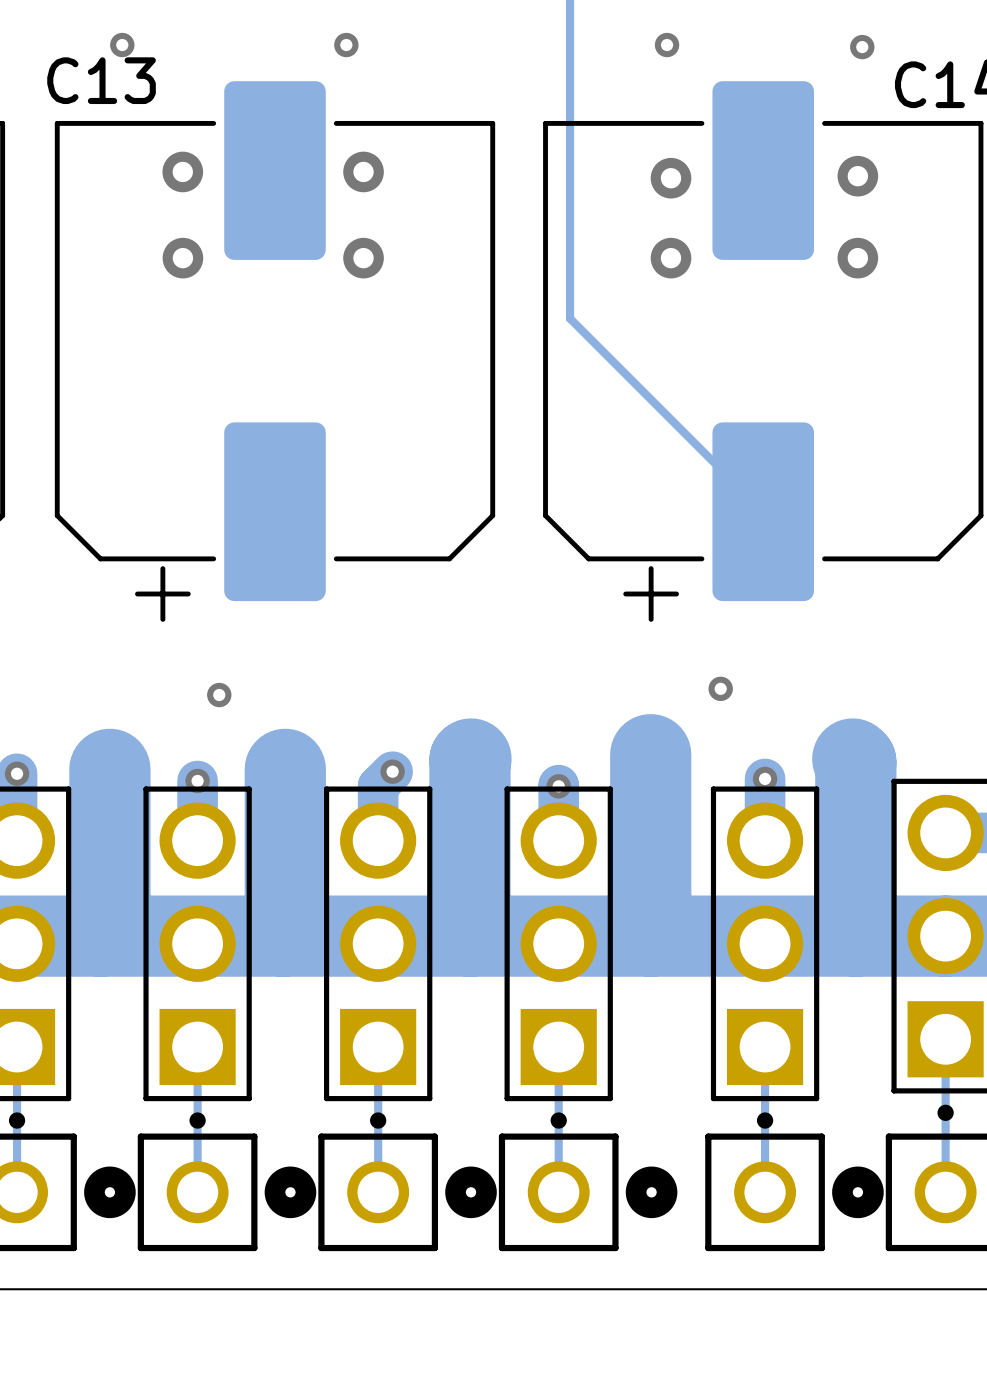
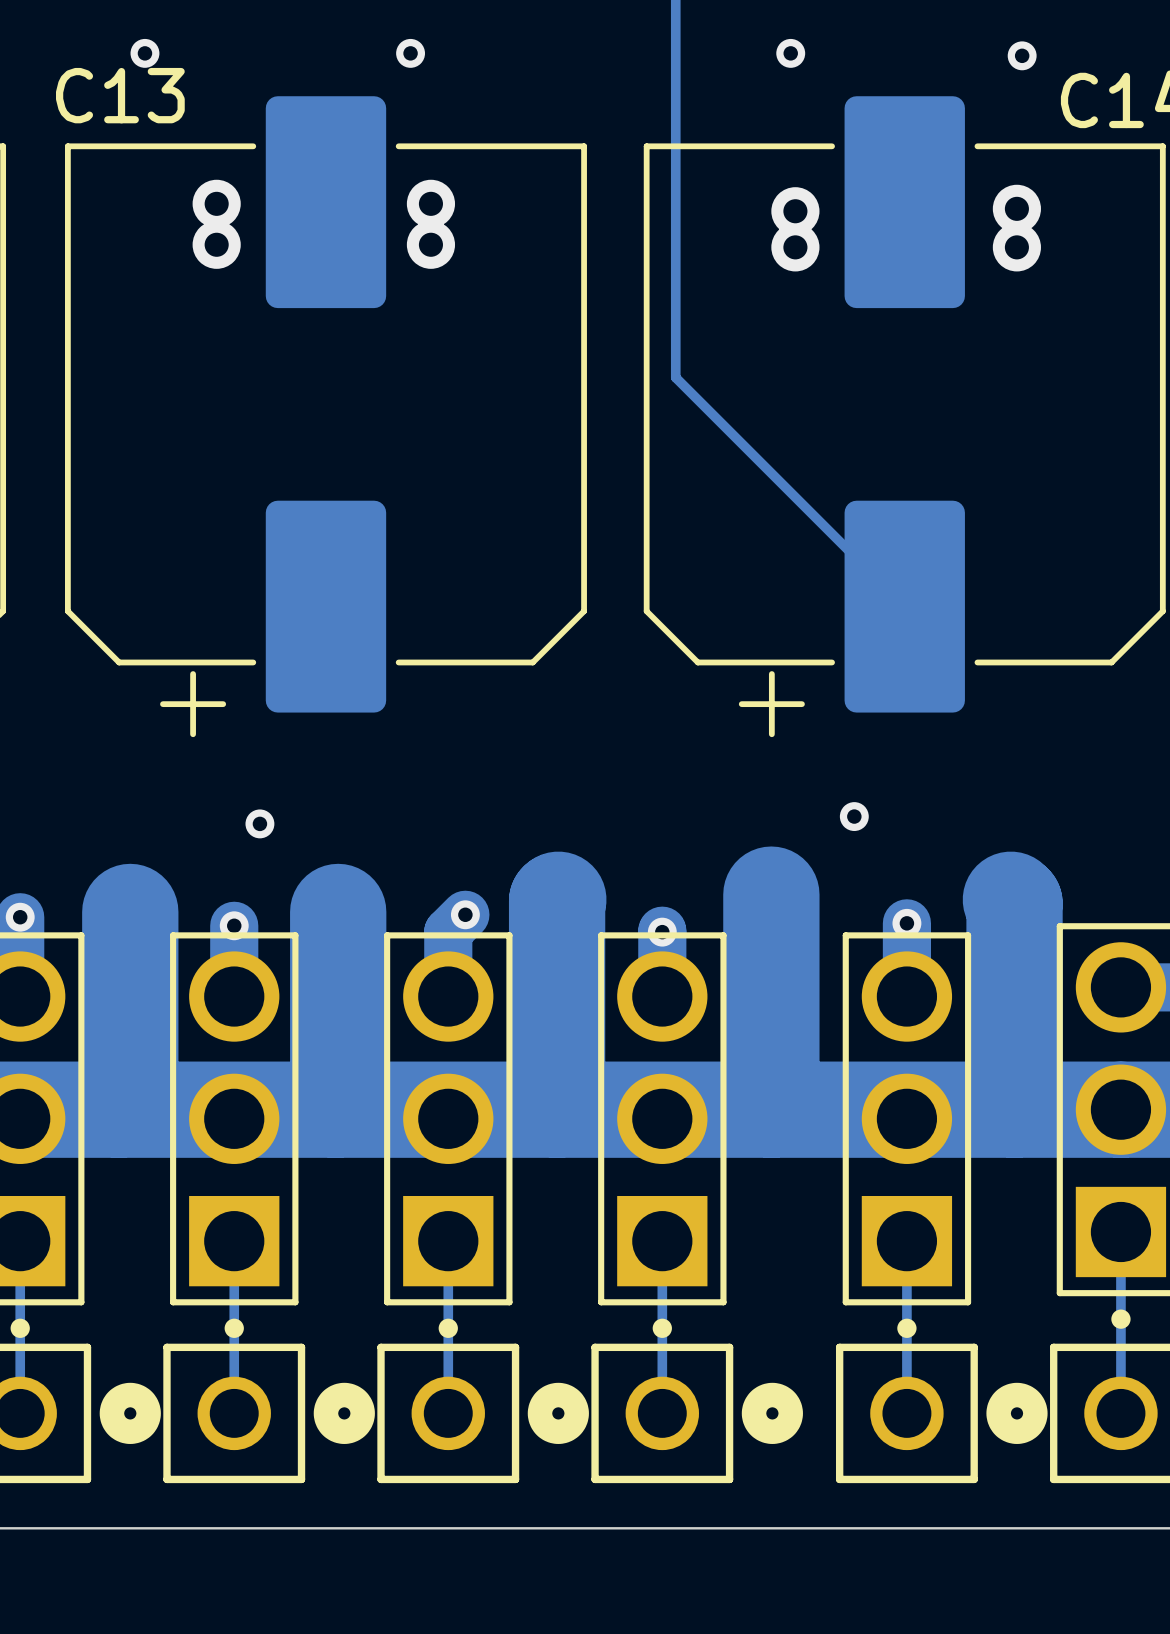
via position: (182, 258) -> (216, 244)
via position: (363, 258) -> (430, 244)
via position: (671, 258) -> (795, 247)
via position: (857, 258) -> (1016, 247)

